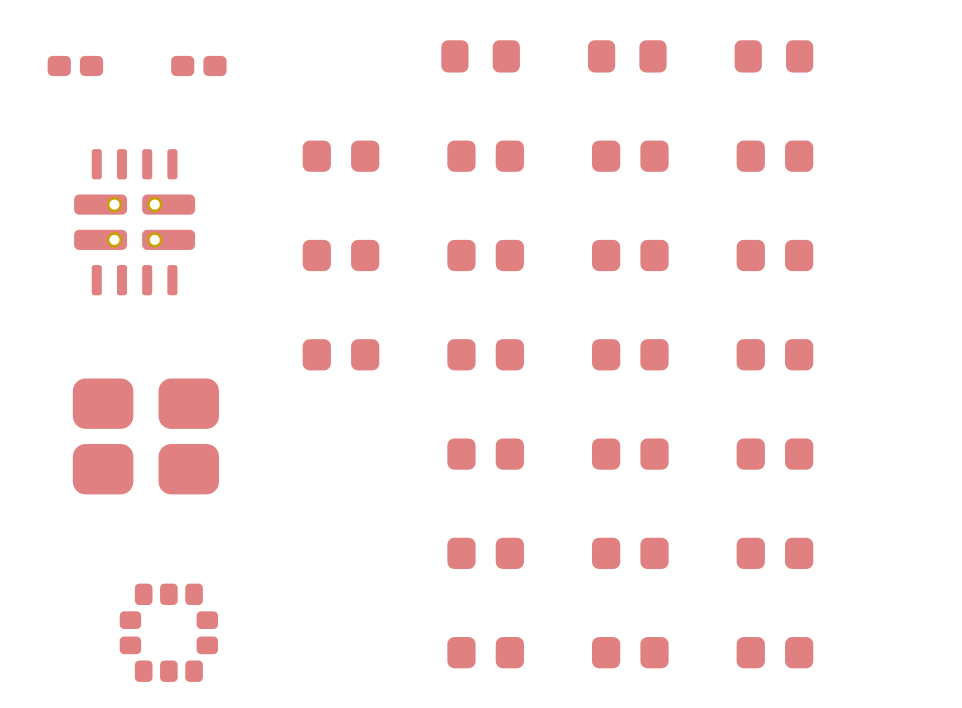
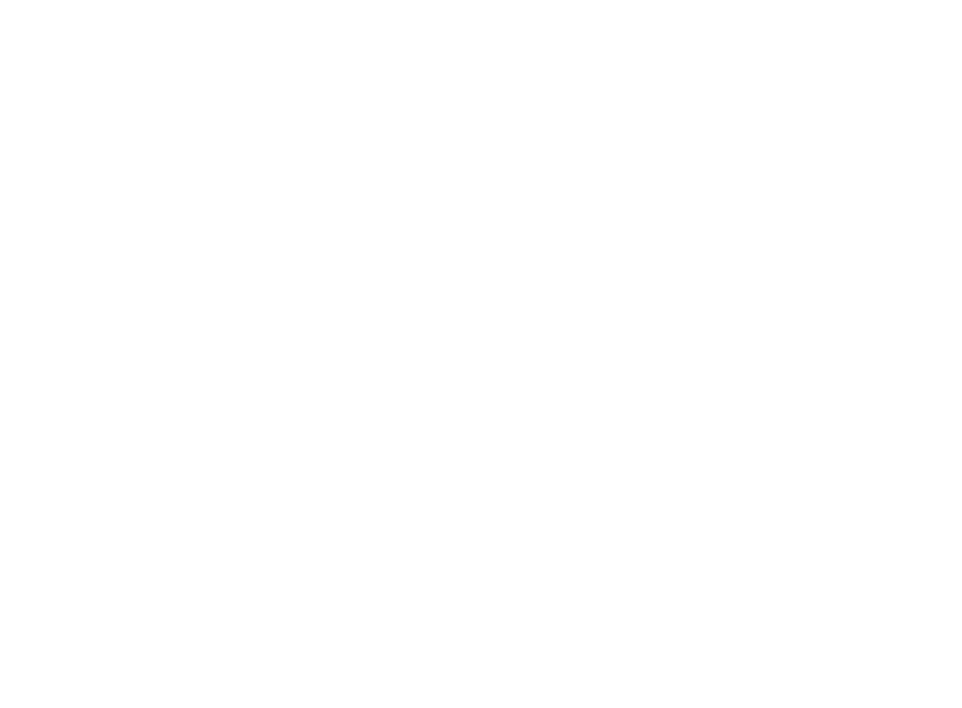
part: (480, 56) -> none
part: (627, 56) -> none
part: (773, 56) -> none
part: (75, 65) -> none
part: (198, 65) -> none
part: (340, 156) -> none
part: (485, 156) -> none
part: (630, 156) -> none
part: (774, 156) -> none
part: (134, 222) -> none
part: (340, 255) -> none
part: (485, 255) -> none
part: (630, 255) -> none
part: (774, 255) -> none
part: (340, 354) -> none
part: (485, 354) -> none
part: (630, 354) -> none
part: (774, 354) -> none
part: (145, 436) -> none
part: (485, 454) -> none
part: (630, 454) -> none
part: (774, 454) -> none
part: (485, 553) -> none
part: (630, 553) -> none
part: (774, 553) -> none
part: (168, 632) -> none
part: (485, 652) -> none
part: (630, 652) -> none
part: (774, 652) -> none

